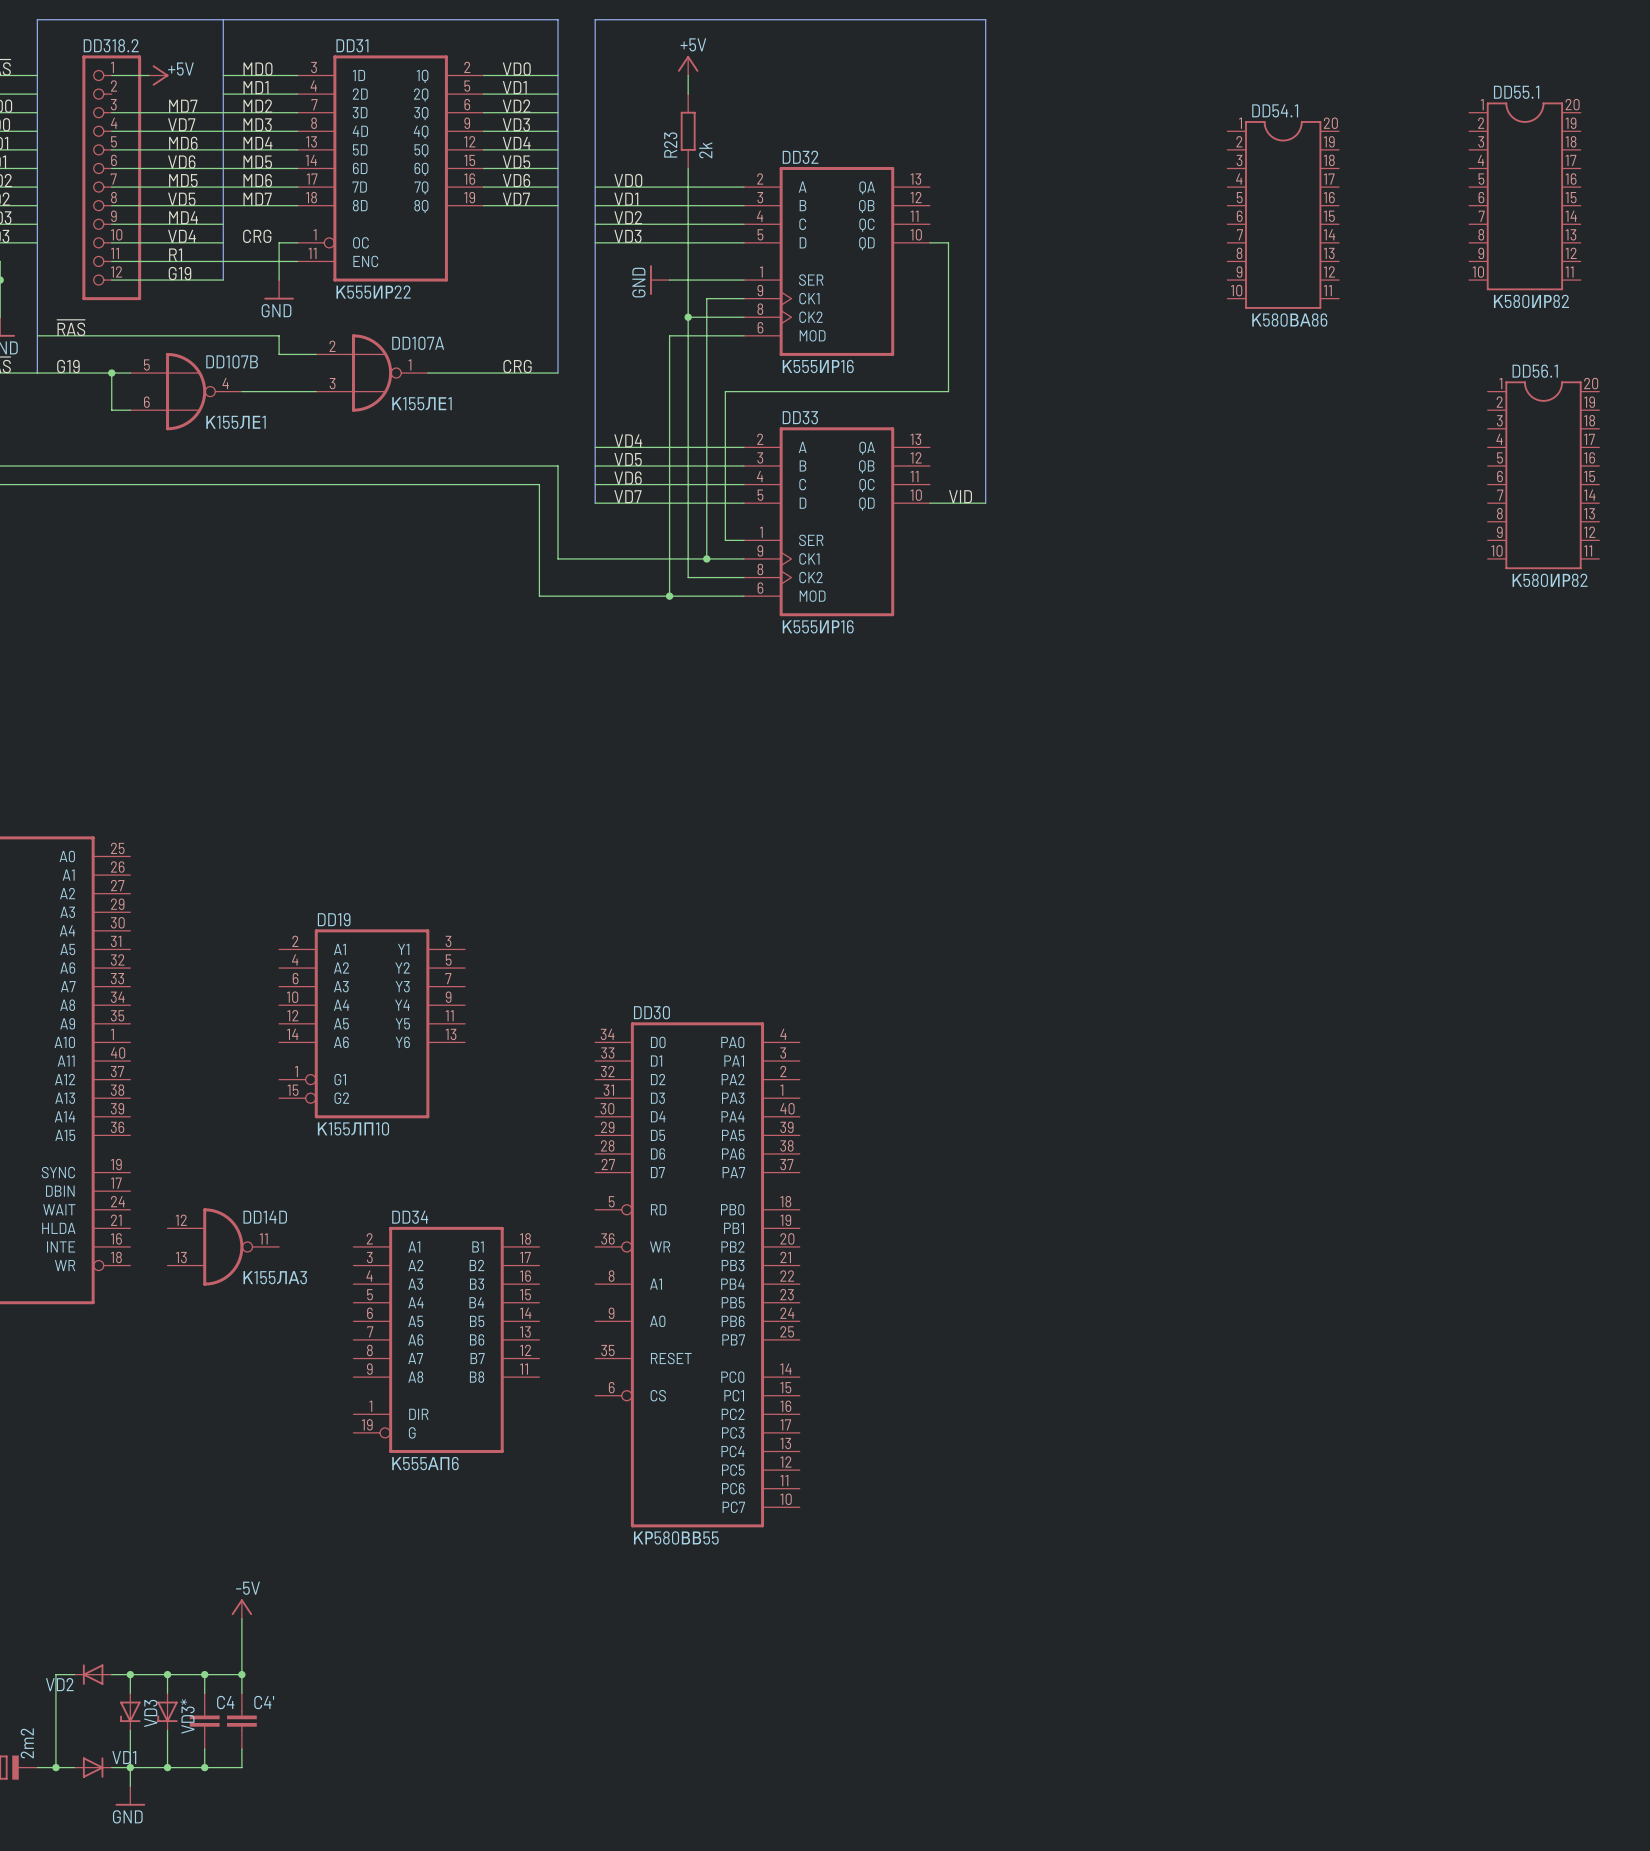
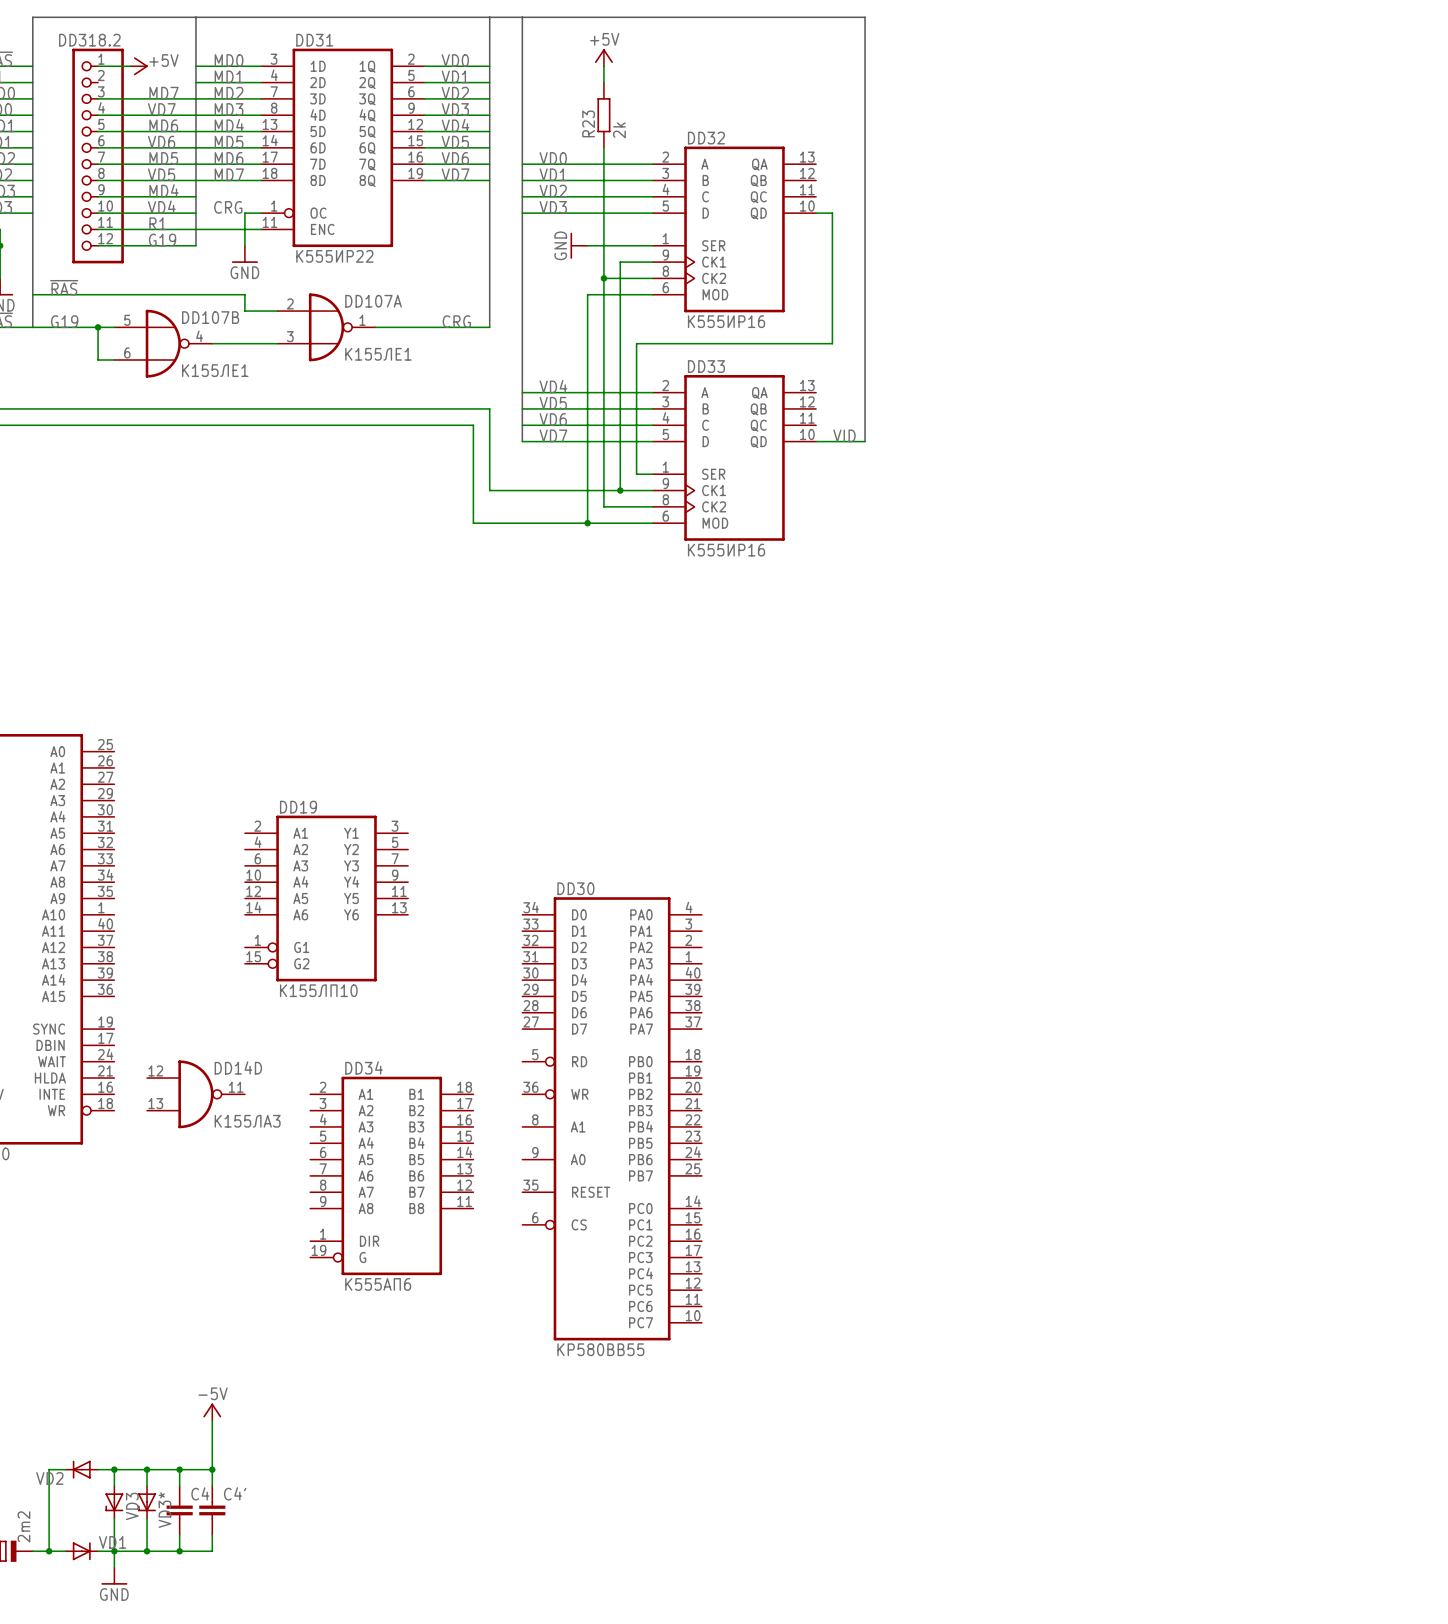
bus: none -> (489, 17) (522, 17)
DD55.1: К580ИР82 (1524, 196) -> none
DD54.1: К580ВА86 (1283, 214) -> none
DD56.1: К580ИР82 (1543, 475) -> none

